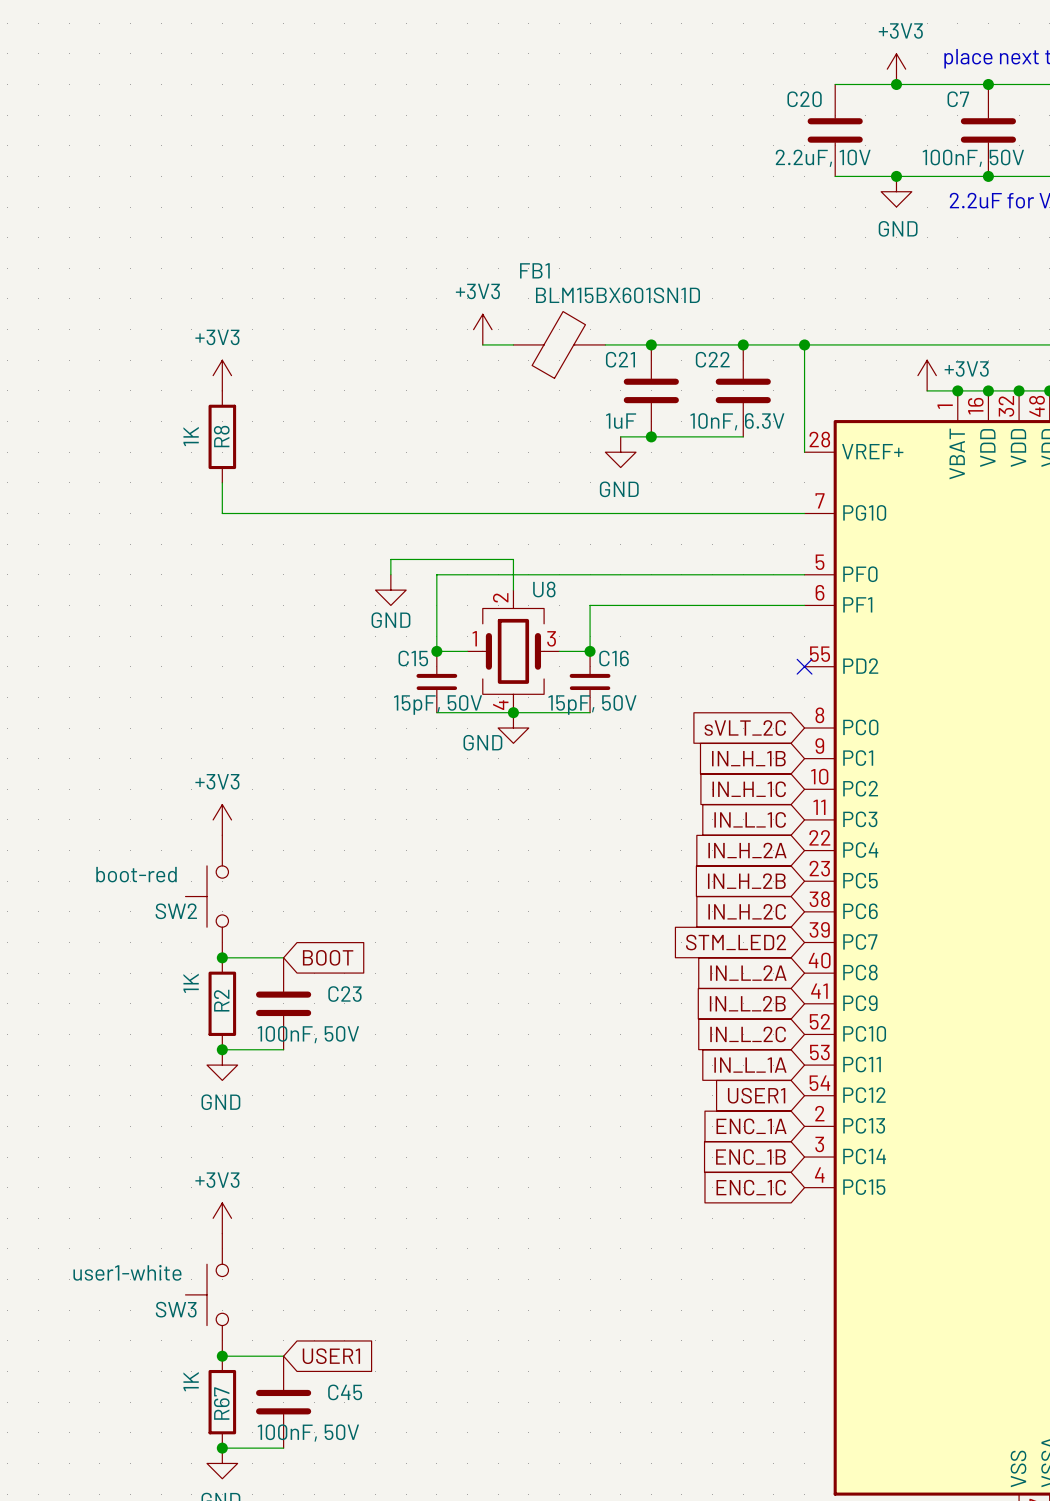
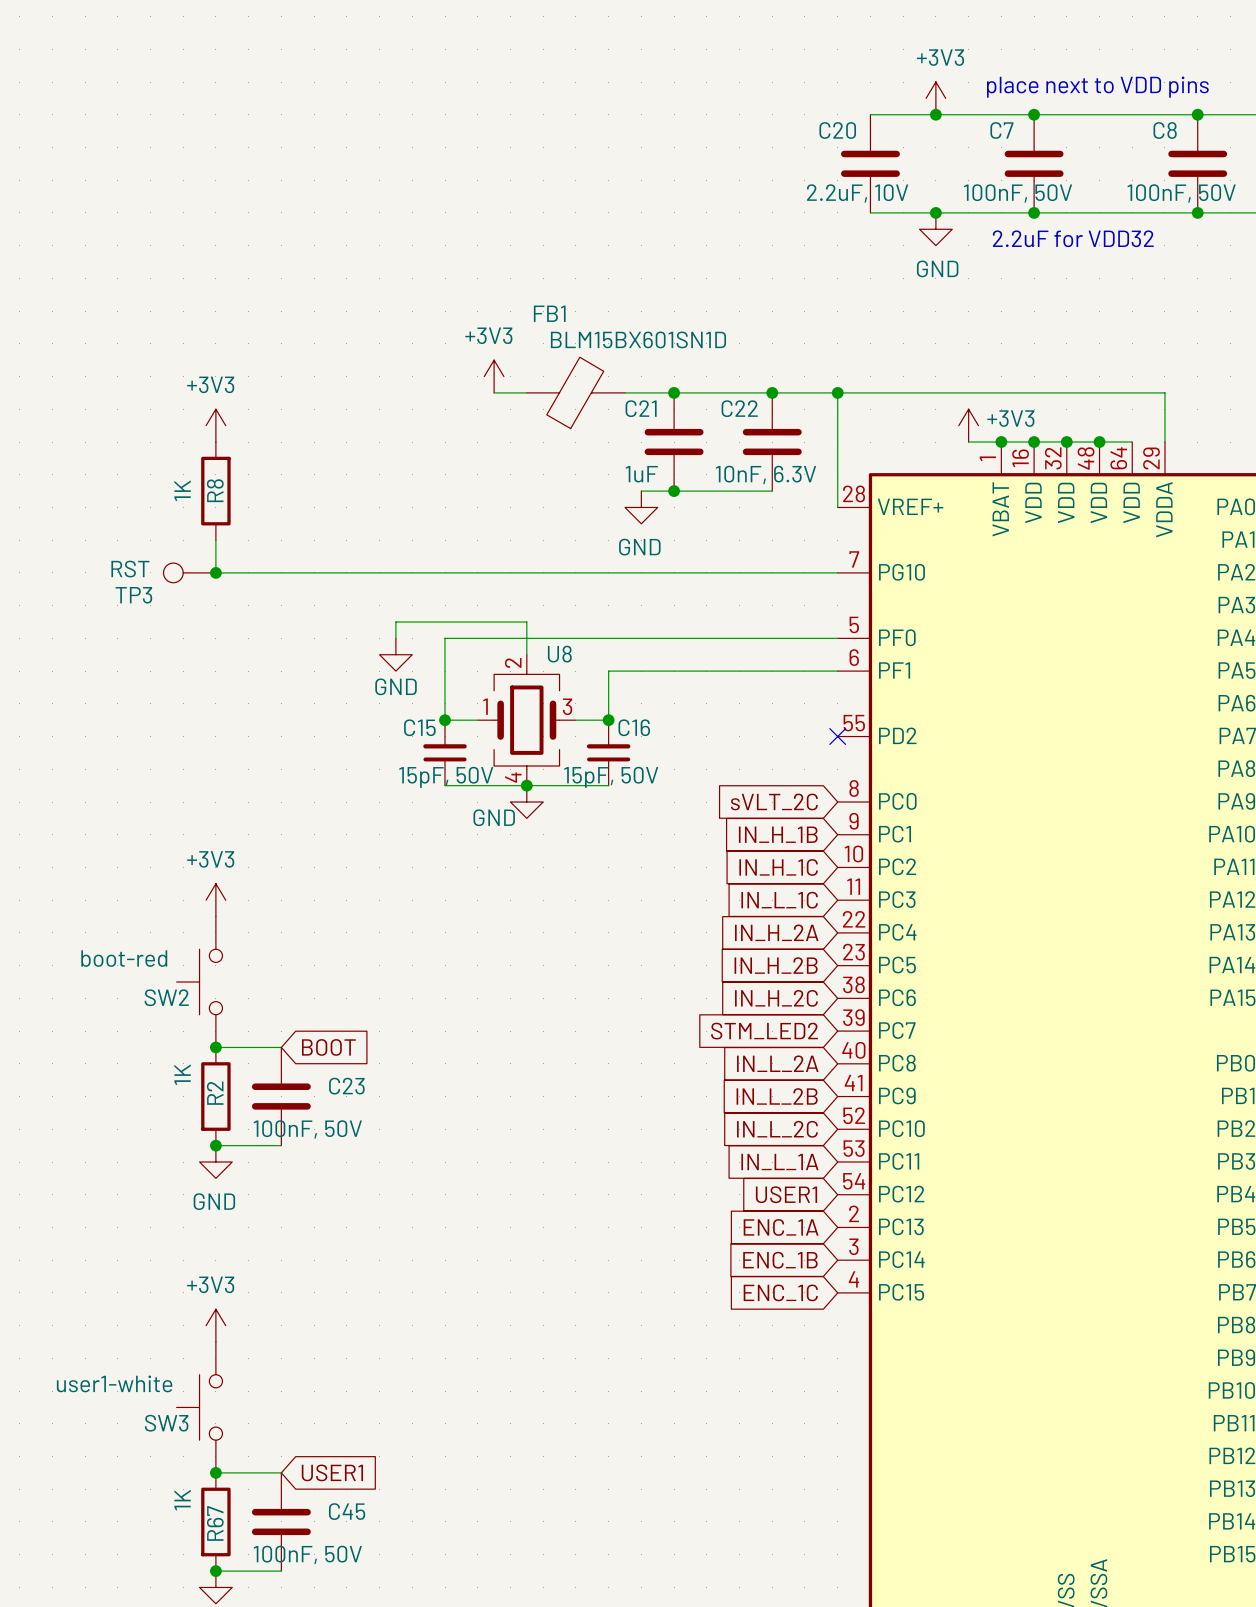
TP3: none -> RST (189, 572)
junction: none -> (215, 572)

